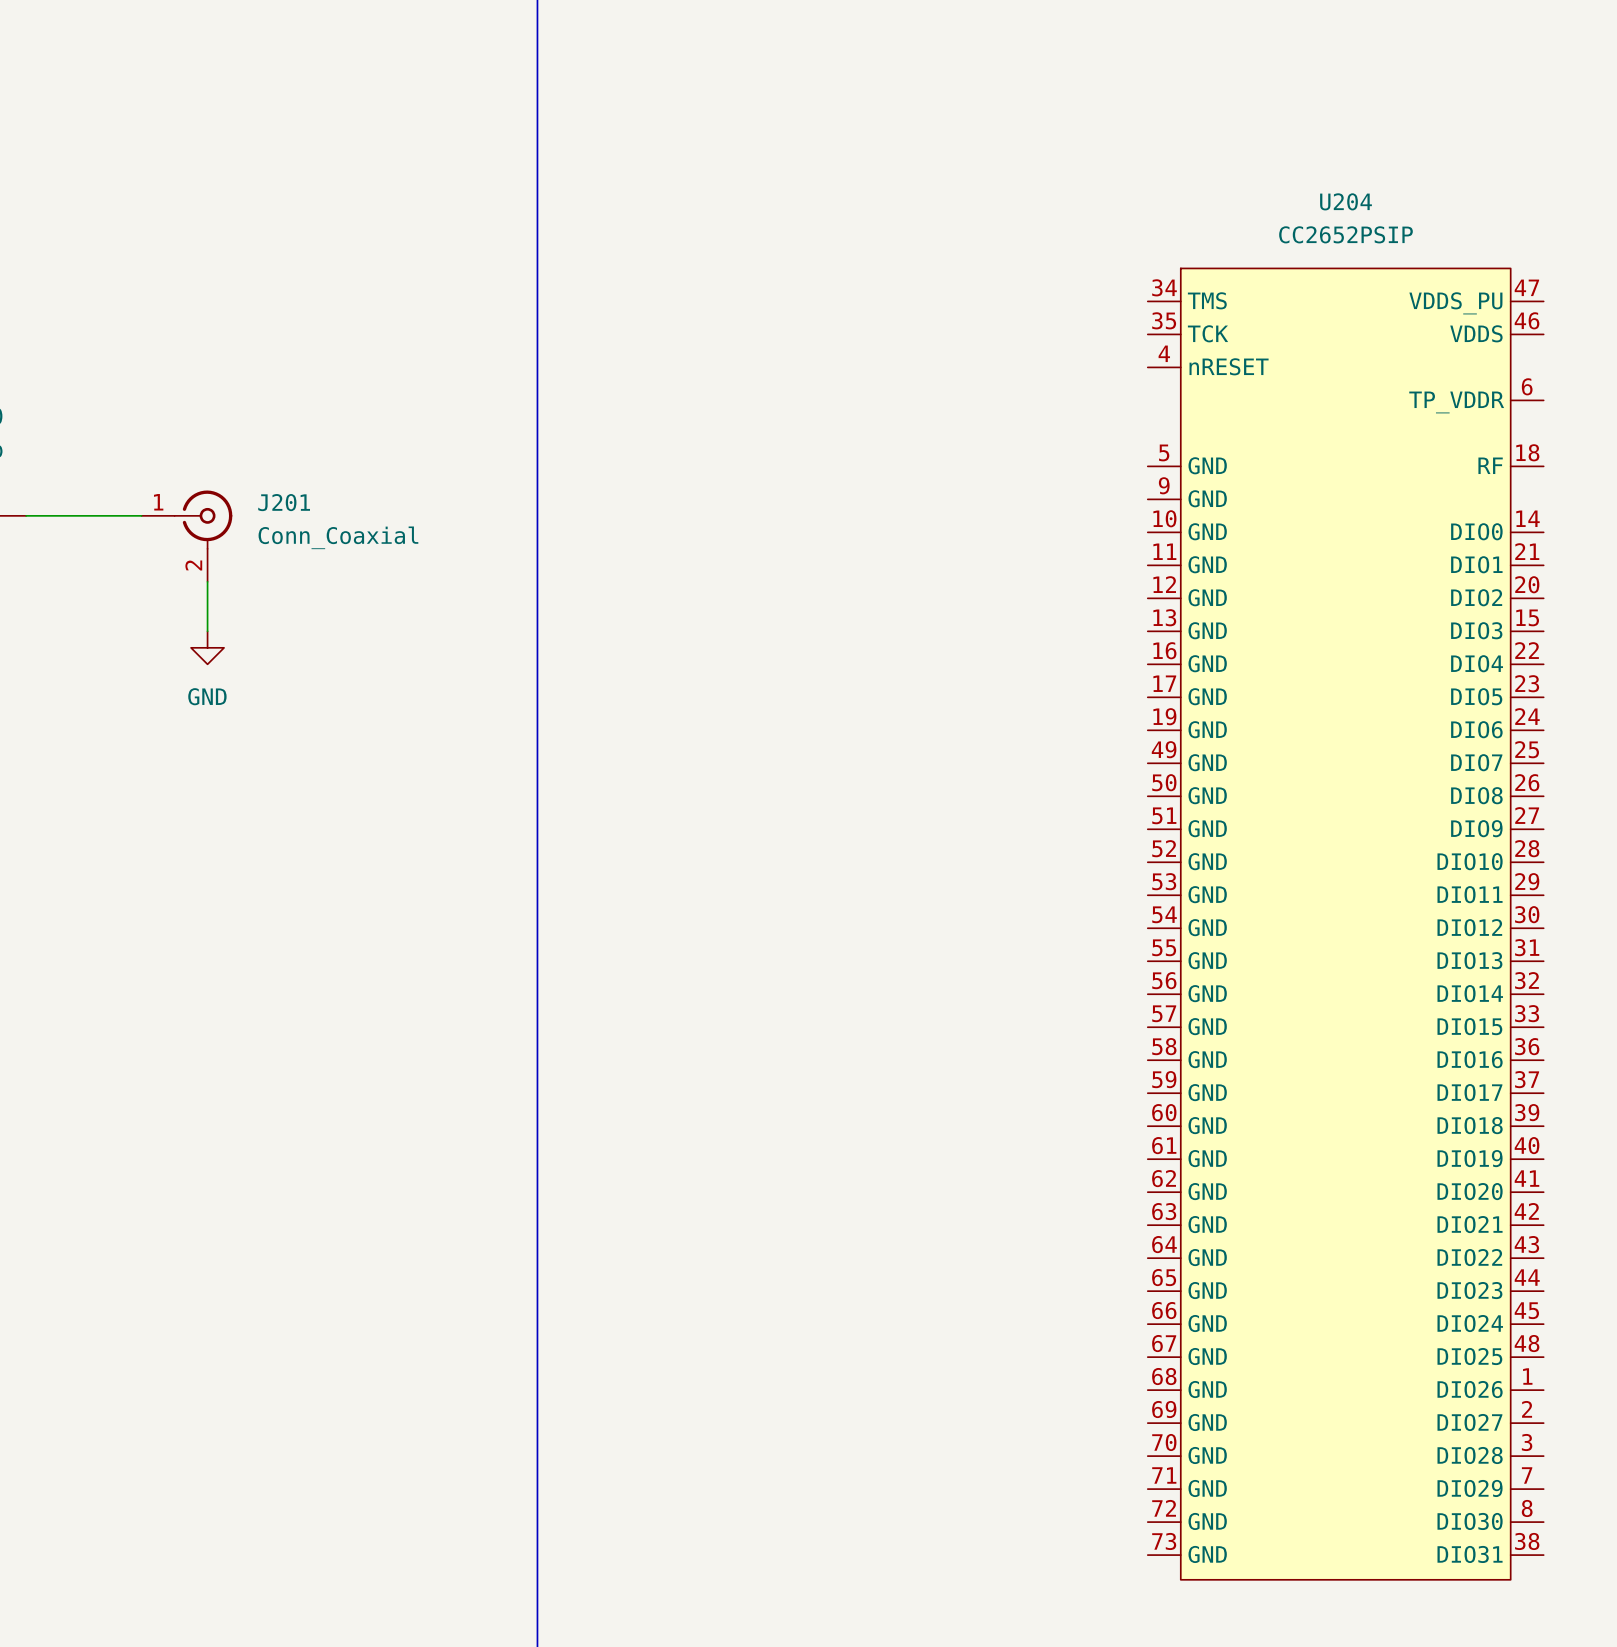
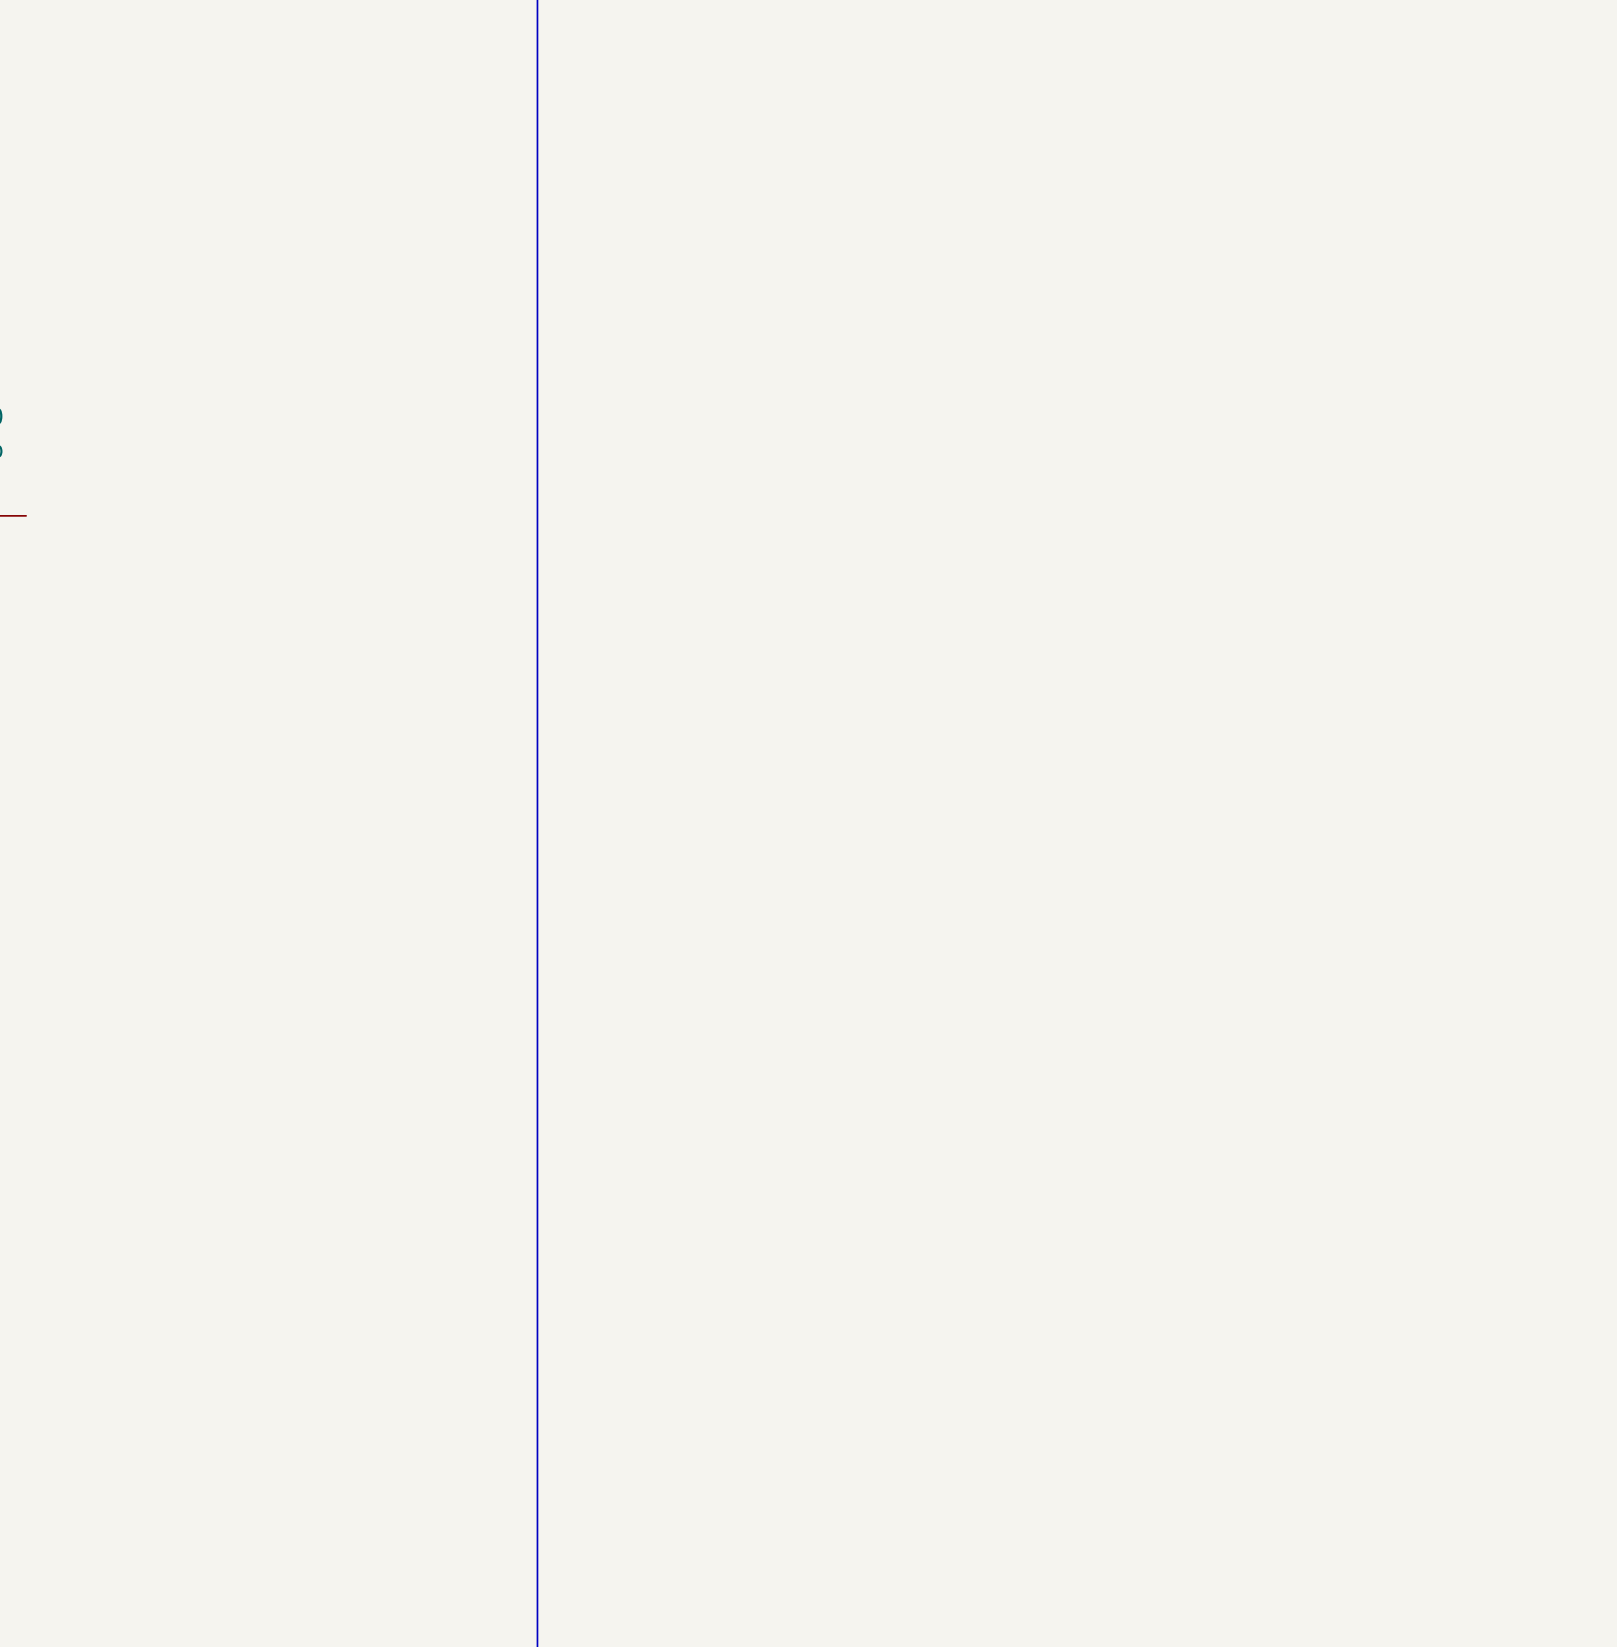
wire: (26, 515) (141, 515) -> none
J201: Conn_Coaxial (186, 536) -> none
wire: (207, 581) (207, 631) -> none
power symbol: GND (207, 647) -> none
U204: CC2652PSIP (1345, 924) -> none

